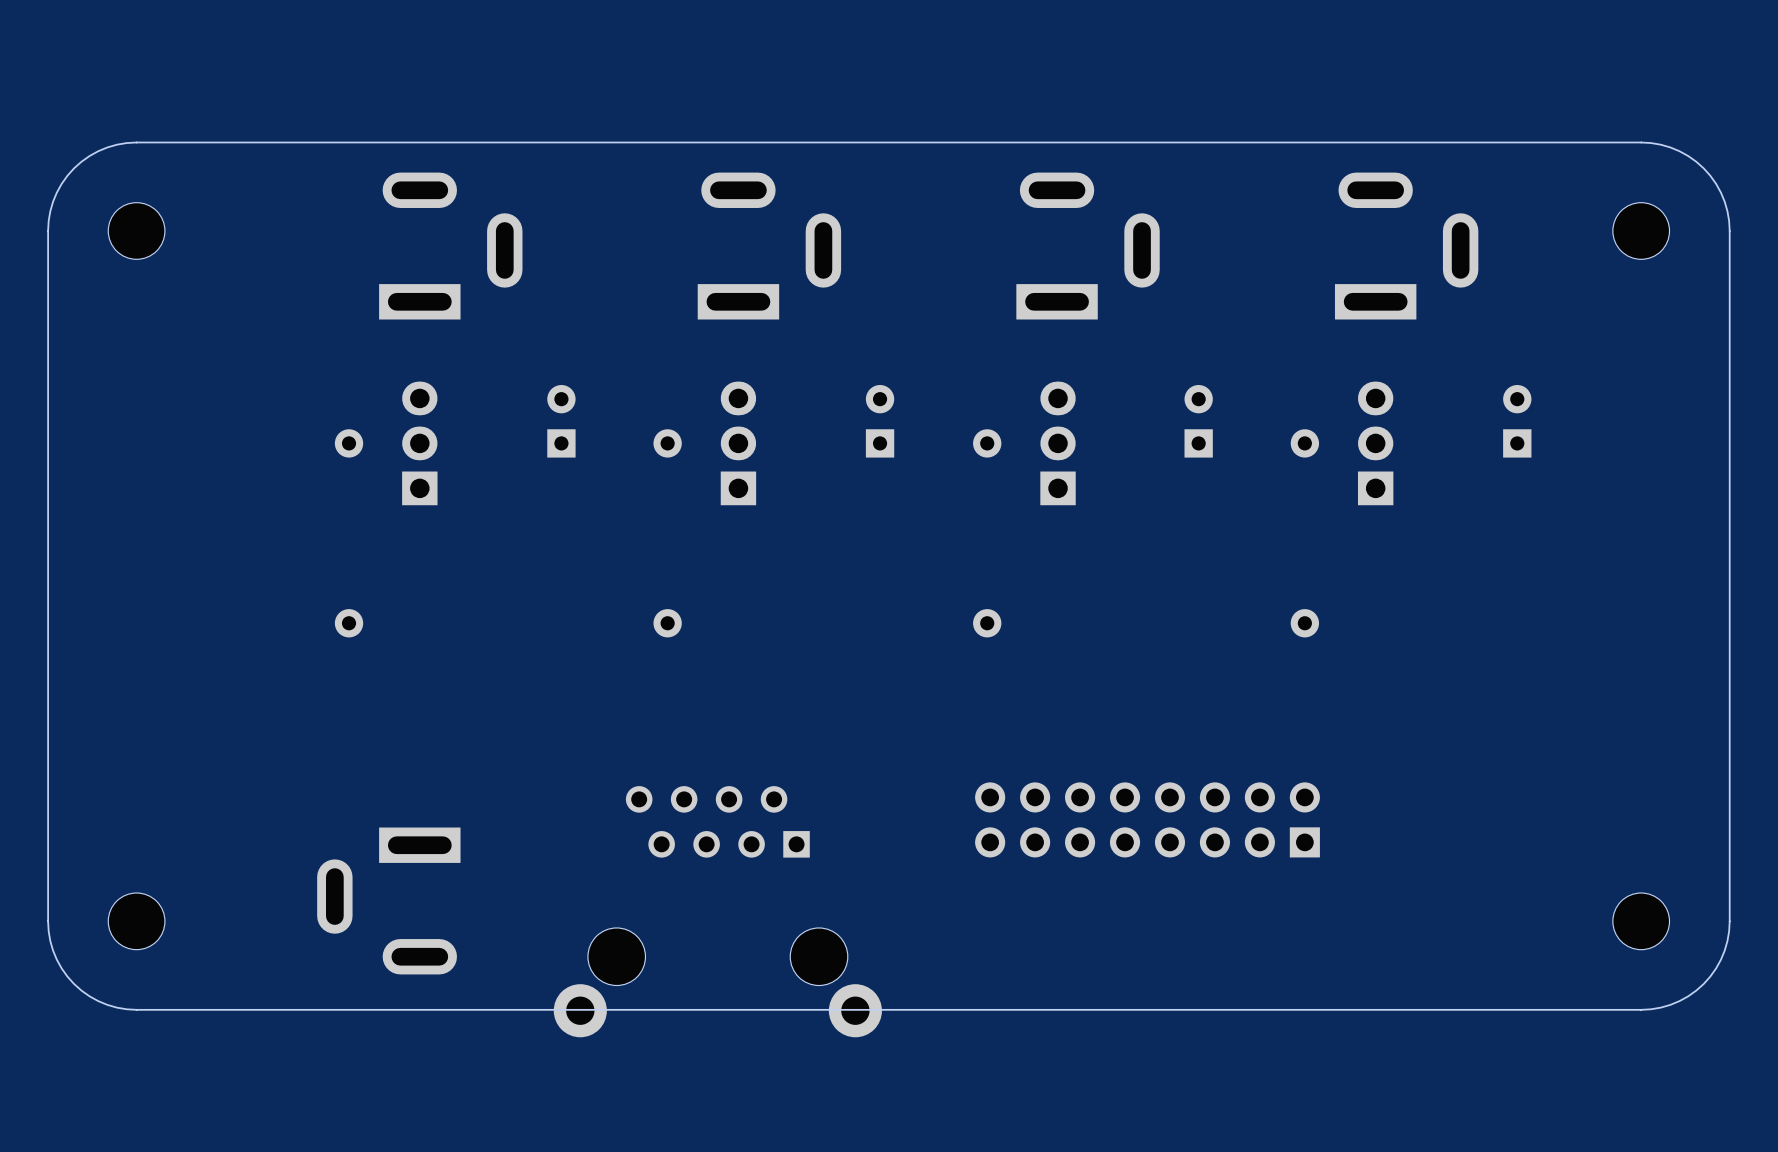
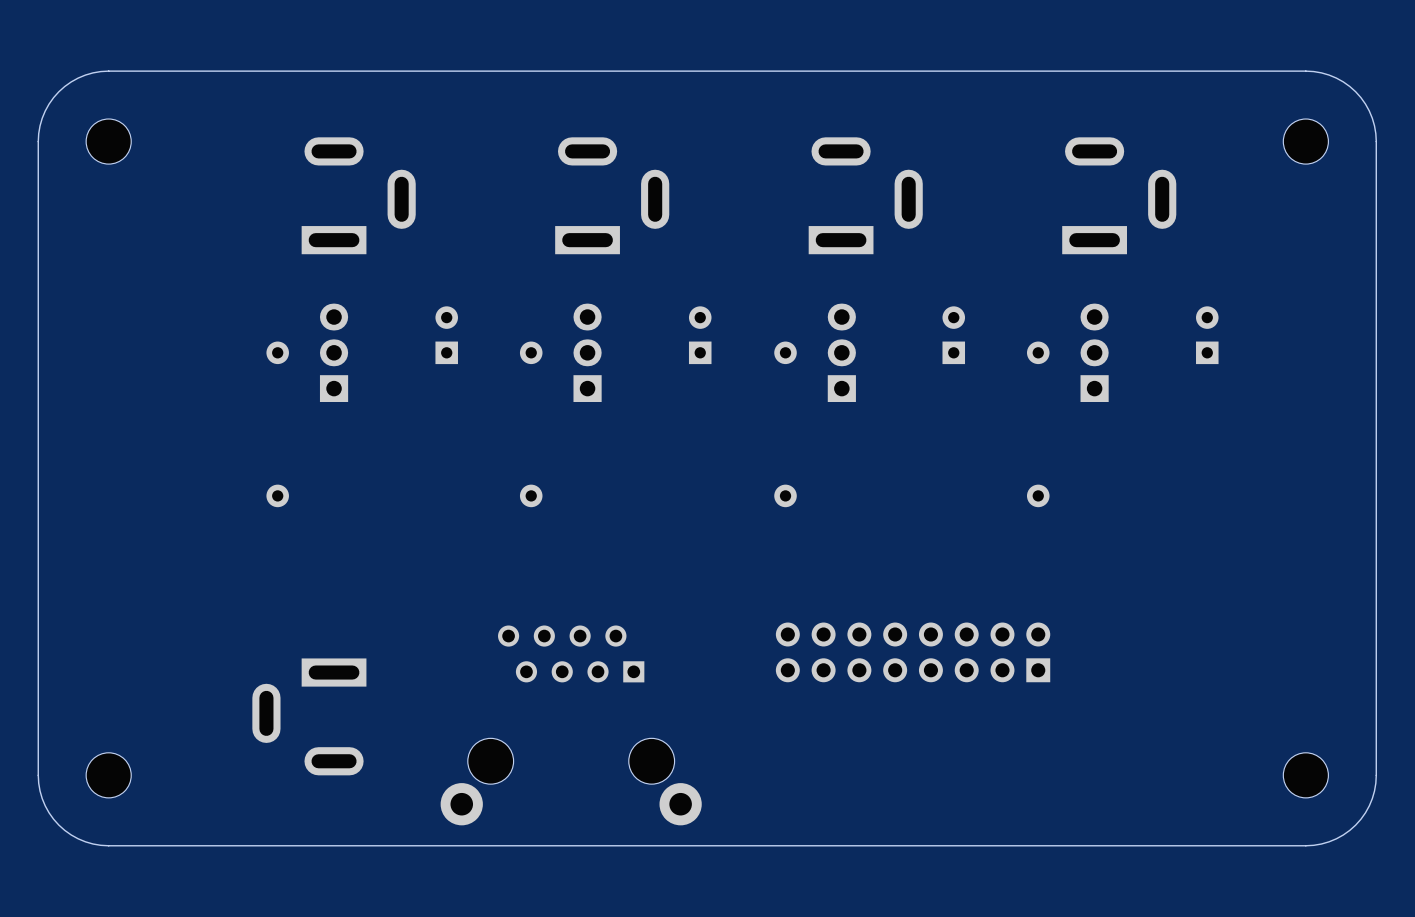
part position: (136, 230) -> (108, 141)
part position: (1641, 230) -> (1305, 141)
board edge: (1729, 230) (1727, 211) (1720, 192) (1703, 168) (1688, 156) (1670, 147) (1641, 142) (136, 142) (107, 147) (89, 156) (74, 168) (61, 183) (53, 201) (48, 230) -> (1376, 183) (1375, 133) (1372, 118) (1365, 104) (1355, 91) (1343, 81) (1329, 75) (1305, 71) (100, 71) (85, 75) (71, 81) (58, 91) (49, 104) (42, 118) (38, 133) (38, 183)
part position: (136, 921) -> (108, 775)
part position: (1641, 921) -> (1305, 775)
board edge: (1729, 921) (1724, 950) (1716, 968) (1703, 983) (1679, 1001) (1660, 1007) (1641, 1009) (136, 1009) (116, 1007) (98, 1001) (74, 983) (61, 968) (53, 950) (48, 921) -> (1376, 733) (1375, 783) (1372, 798) (1365, 812) (1349, 830) (1336, 838) (1321, 844) (1305, 845) (100, 845) (85, 841) (71, 834) (58, 825) (49, 812) (42, 798) (38, 783) (38, 733)

